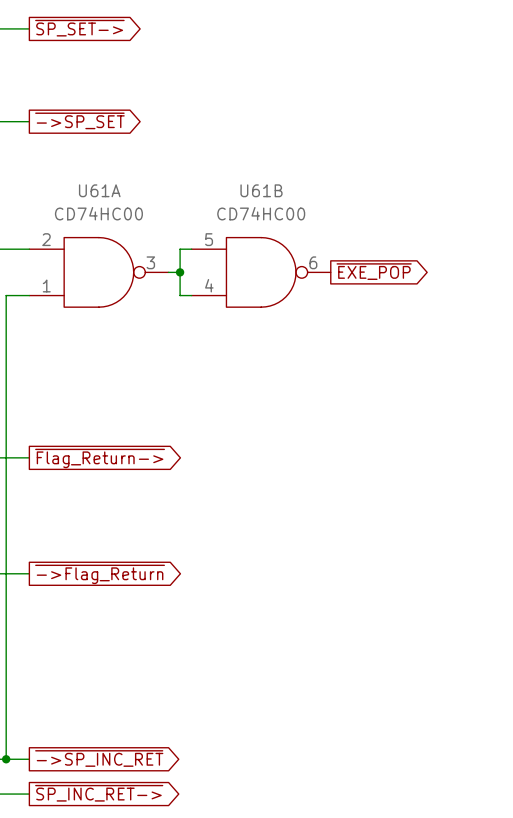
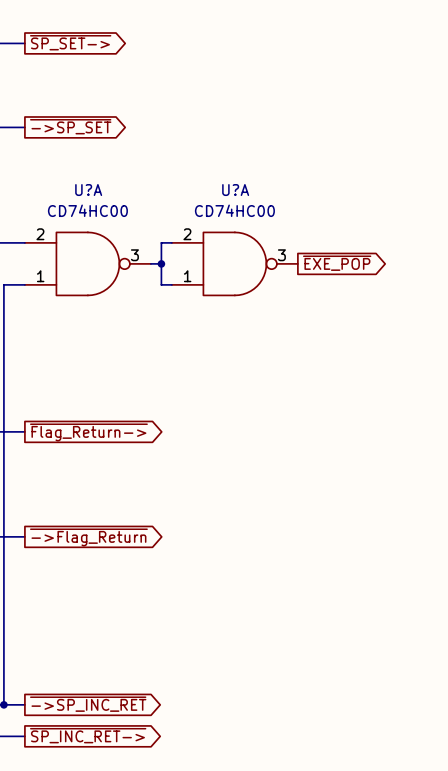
U61A name: U61A (99, 190) -> U?A (88, 190)
U61B name: U61B (261, 190) -> U?A (235, 190)
U61B pin number: 5 (209, 239) -> 2 (187, 234)
U61B pin number: 6 (313, 262) -> 3 (281, 255)
U61B pin number: 4 (209, 285) -> 1 (187, 276)

